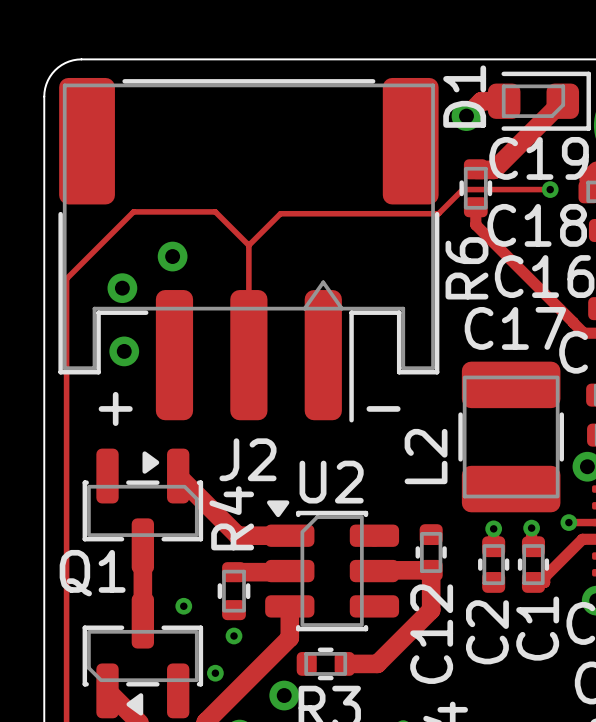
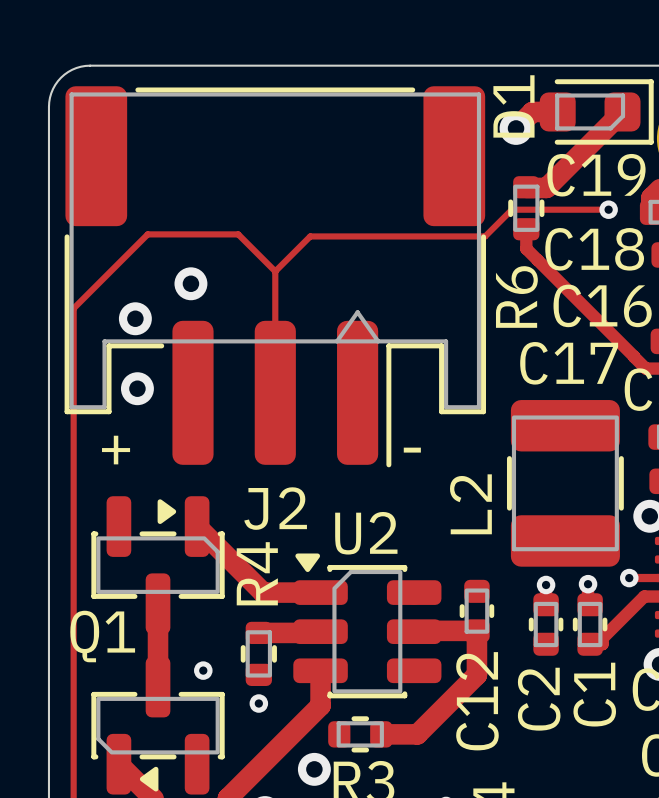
via: (215, 673) -> none

